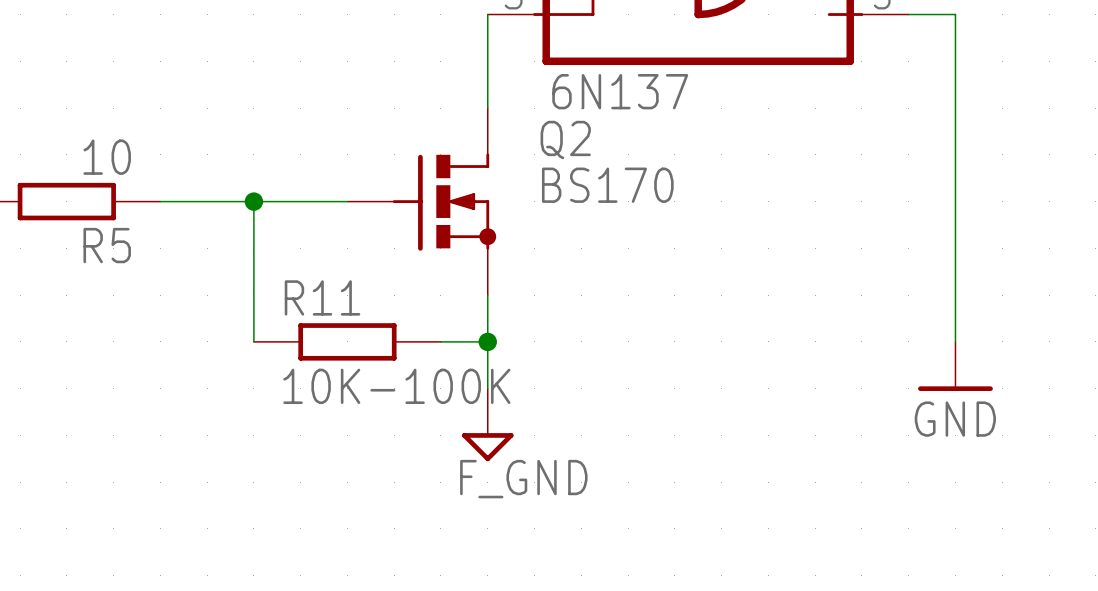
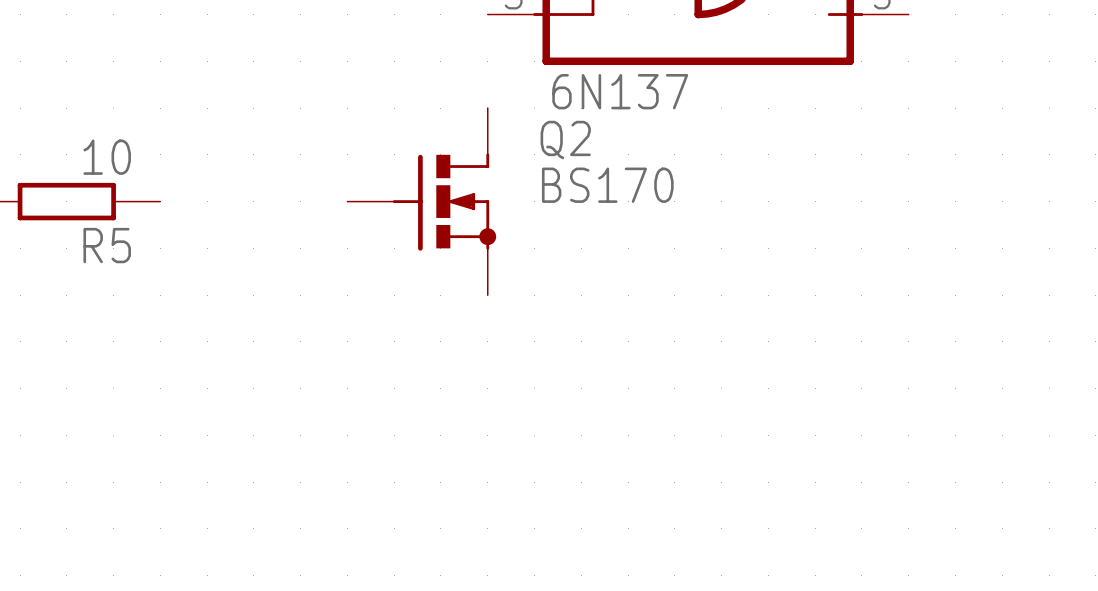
wire: (487, 14) (487, 108) -> none
wire: (908, 14) (955, 14) (955, 341) -> none
wire: (160, 201) (347, 201) -> none
wire: (253, 201) (253, 341) -> none
junction: (253, 201) -> none
wire: (487, 295) (487, 388) -> none
R11: 10K-100K (347, 341) -> none
wire: (440, 341) (487, 341) -> none
junction: (487, 341) -> none
power symbol: GND (955, 366) -> none
power symbol: F_GND (487, 424) -> none

